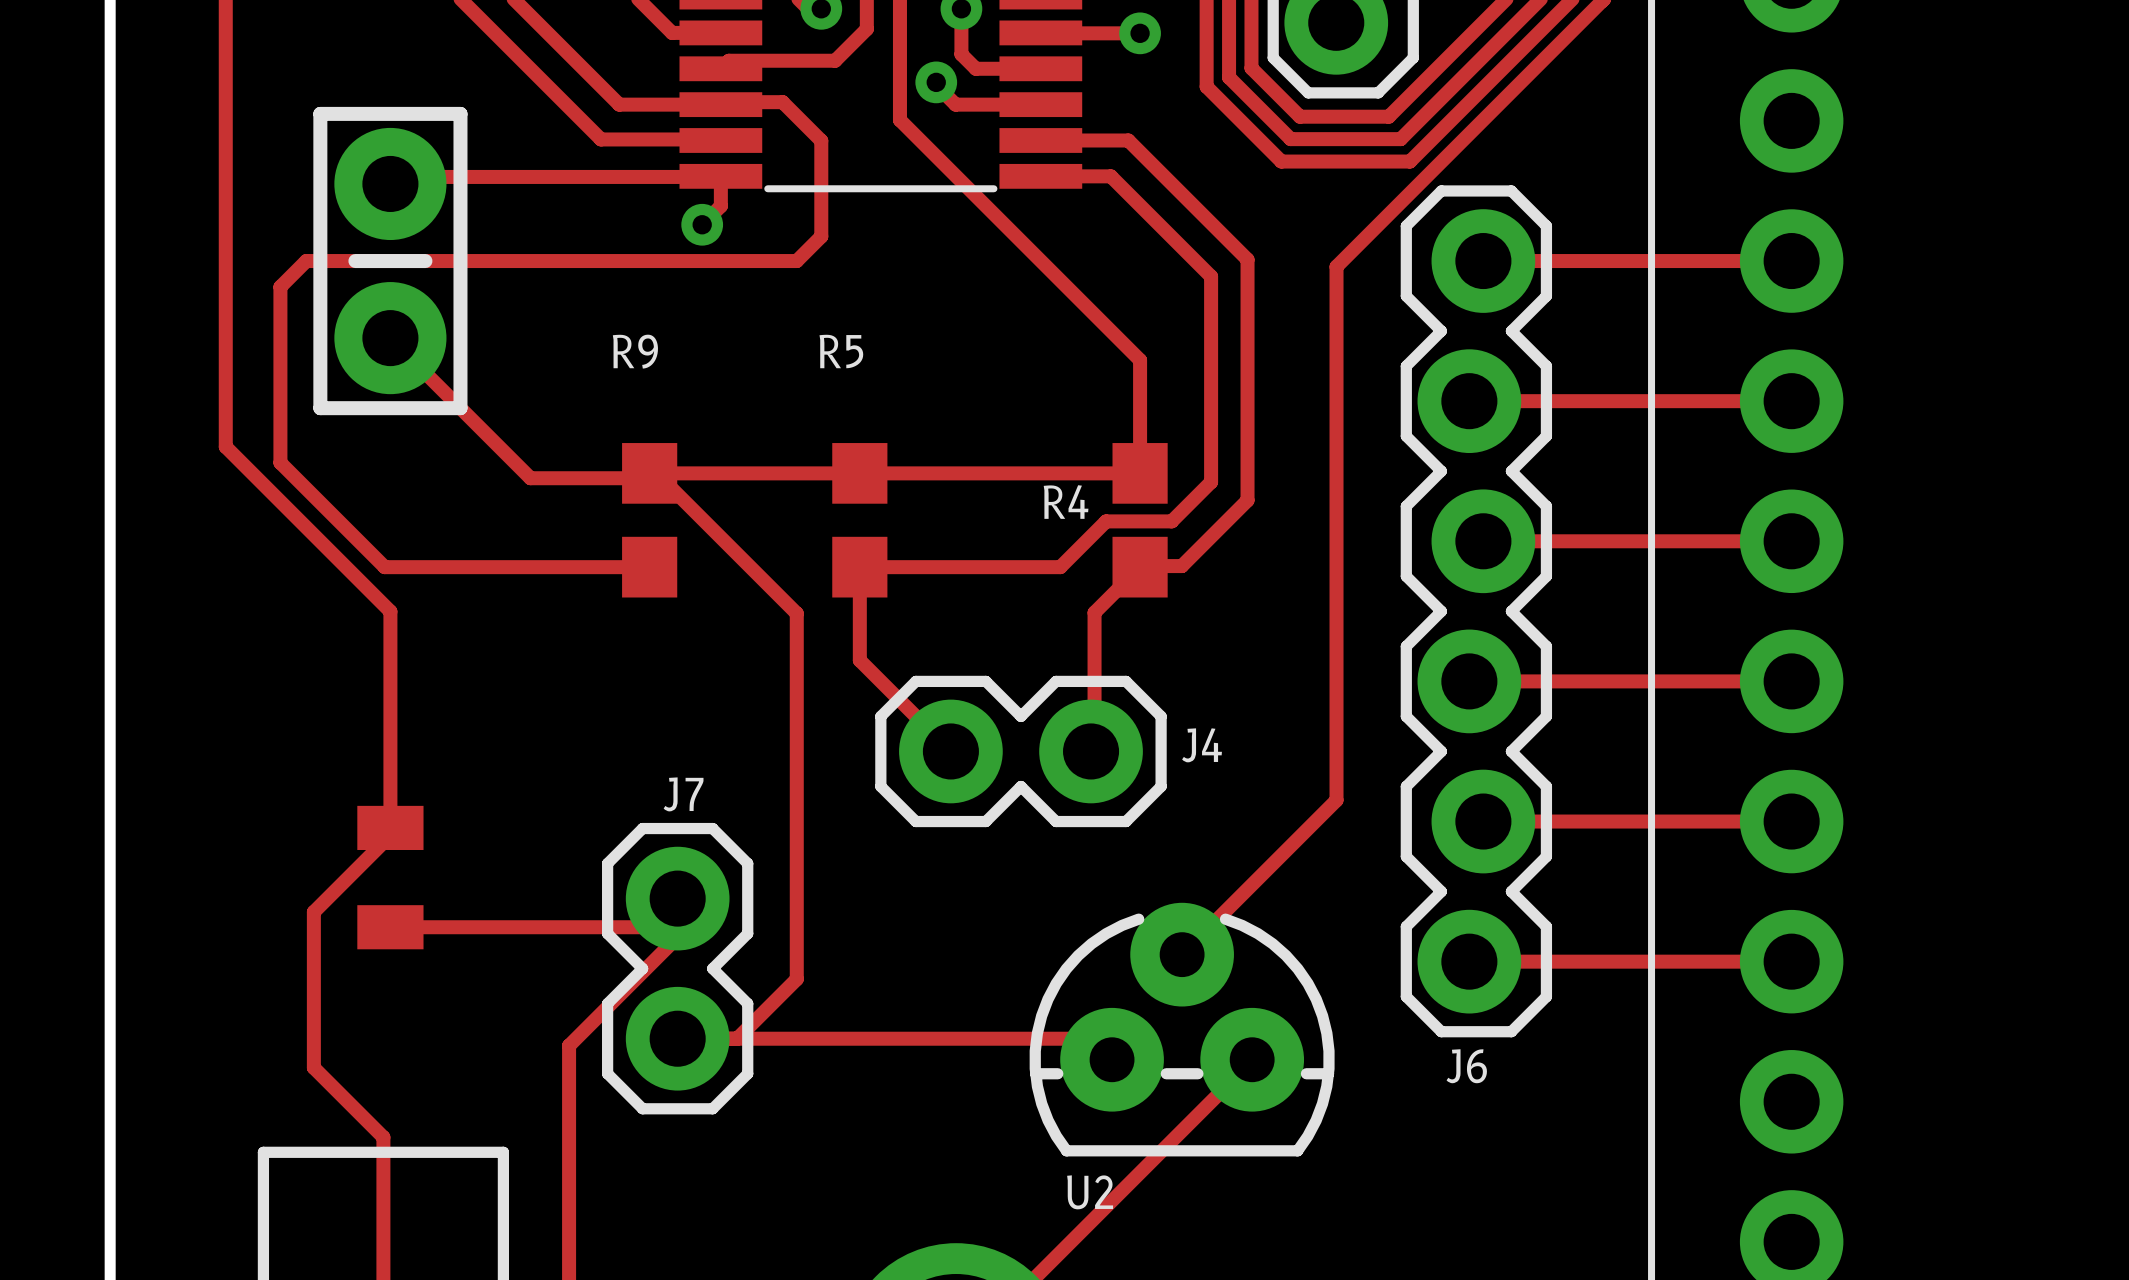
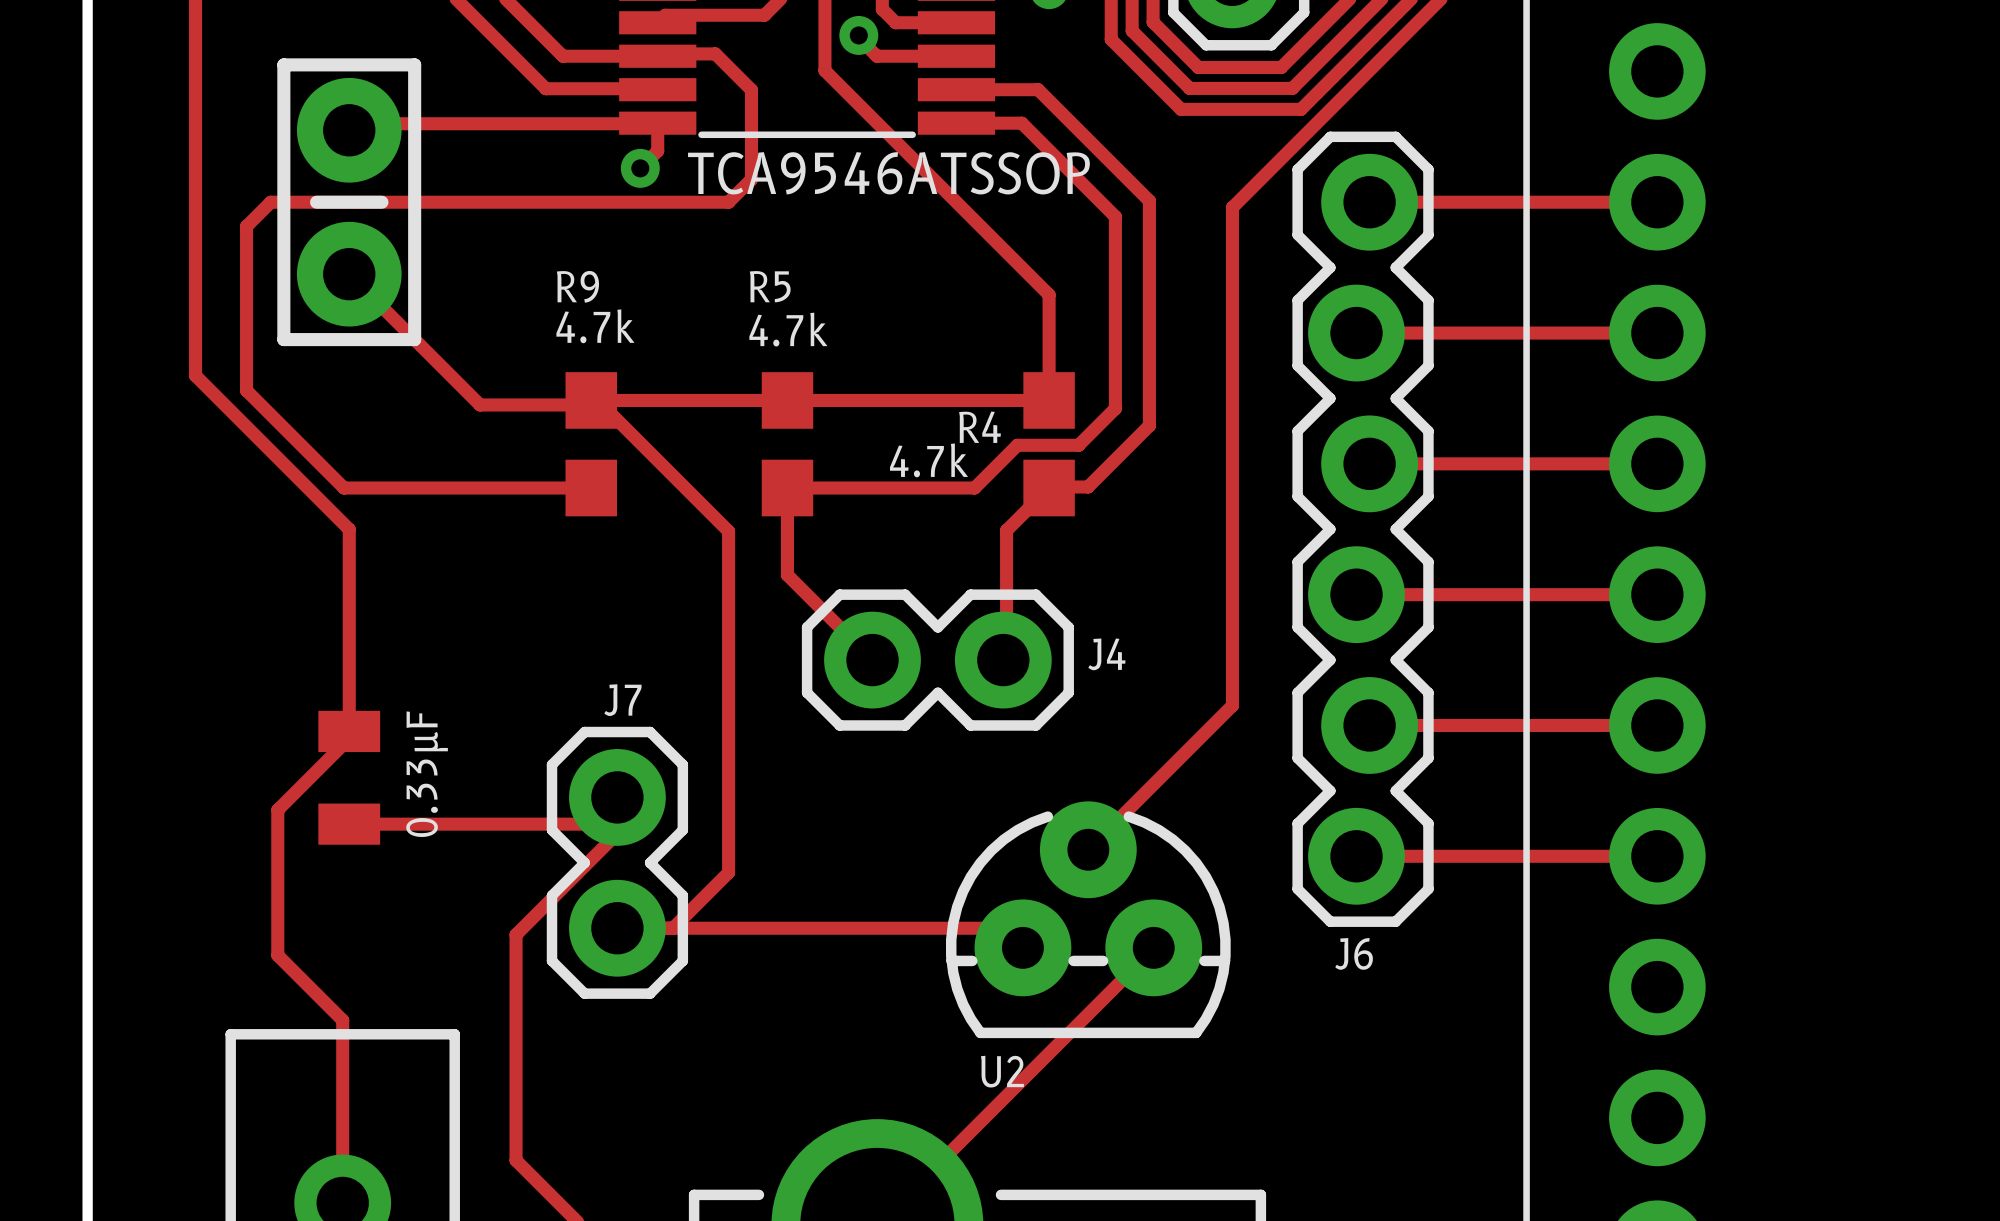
part value: none -> TCA9546ATSSOP (888, 173)
R9 value: none -> 4.7k (595, 326)
R5 value: none -> 4.7k (788, 329)
R4 value: none -> 4.7k (929, 460)
part value: none -> 0.33µF (427, 774)

